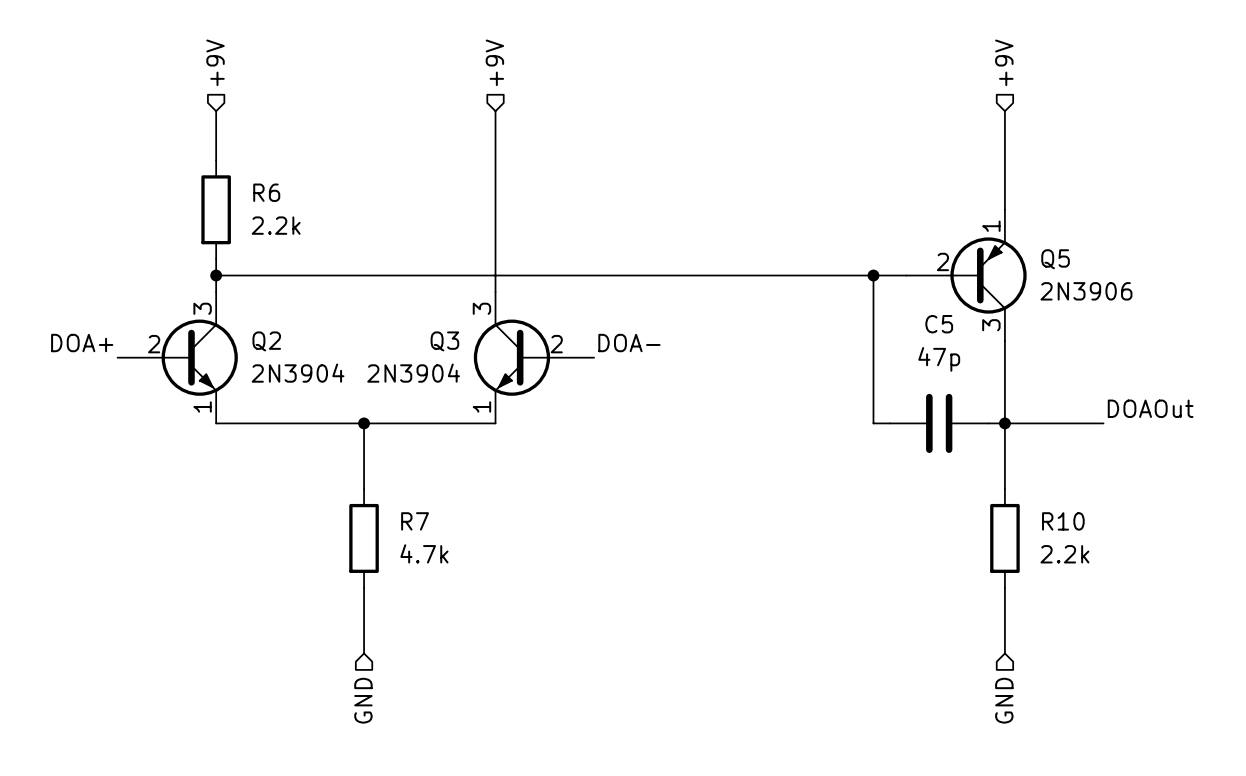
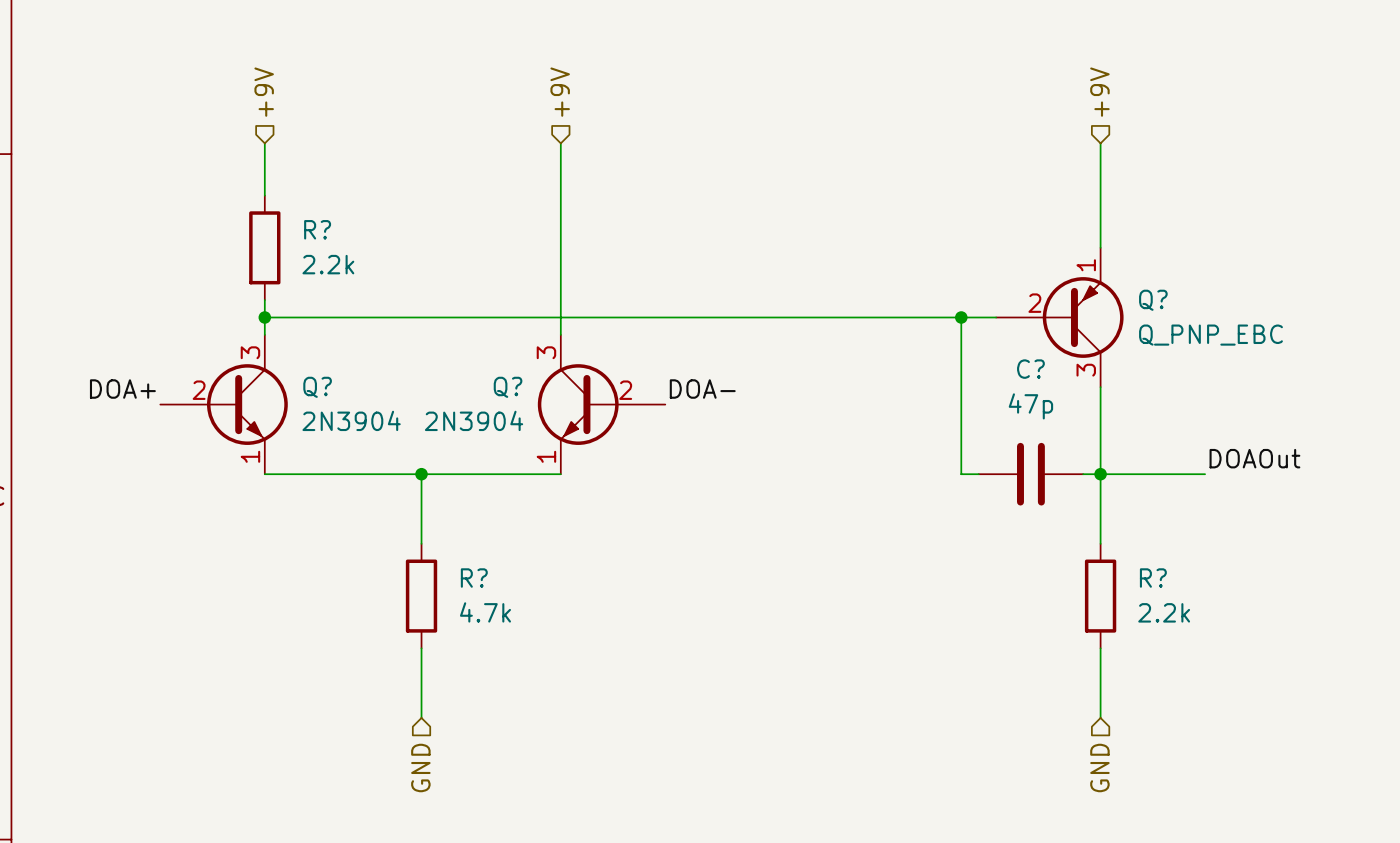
R6 name: R6 (266, 192) -> R? (317, 229)
Q5 name: Q5 (1055, 259) -> Q? (1153, 300)
Q5 value: 2N3906 (1086, 291) -> Q_PNP_EBC (1210, 335)
C5 name: C5 (939, 324) -> C? (1030, 369)
Q2 name: Q2 (266, 341) -> Q? (317, 387)
Q3 name: Q3 (444, 341) -> Q? (508, 387)
R7 name: R7 (415, 521) -> R? (474, 578)
R10 name: R10 (1063, 521) -> R? (1153, 578)

